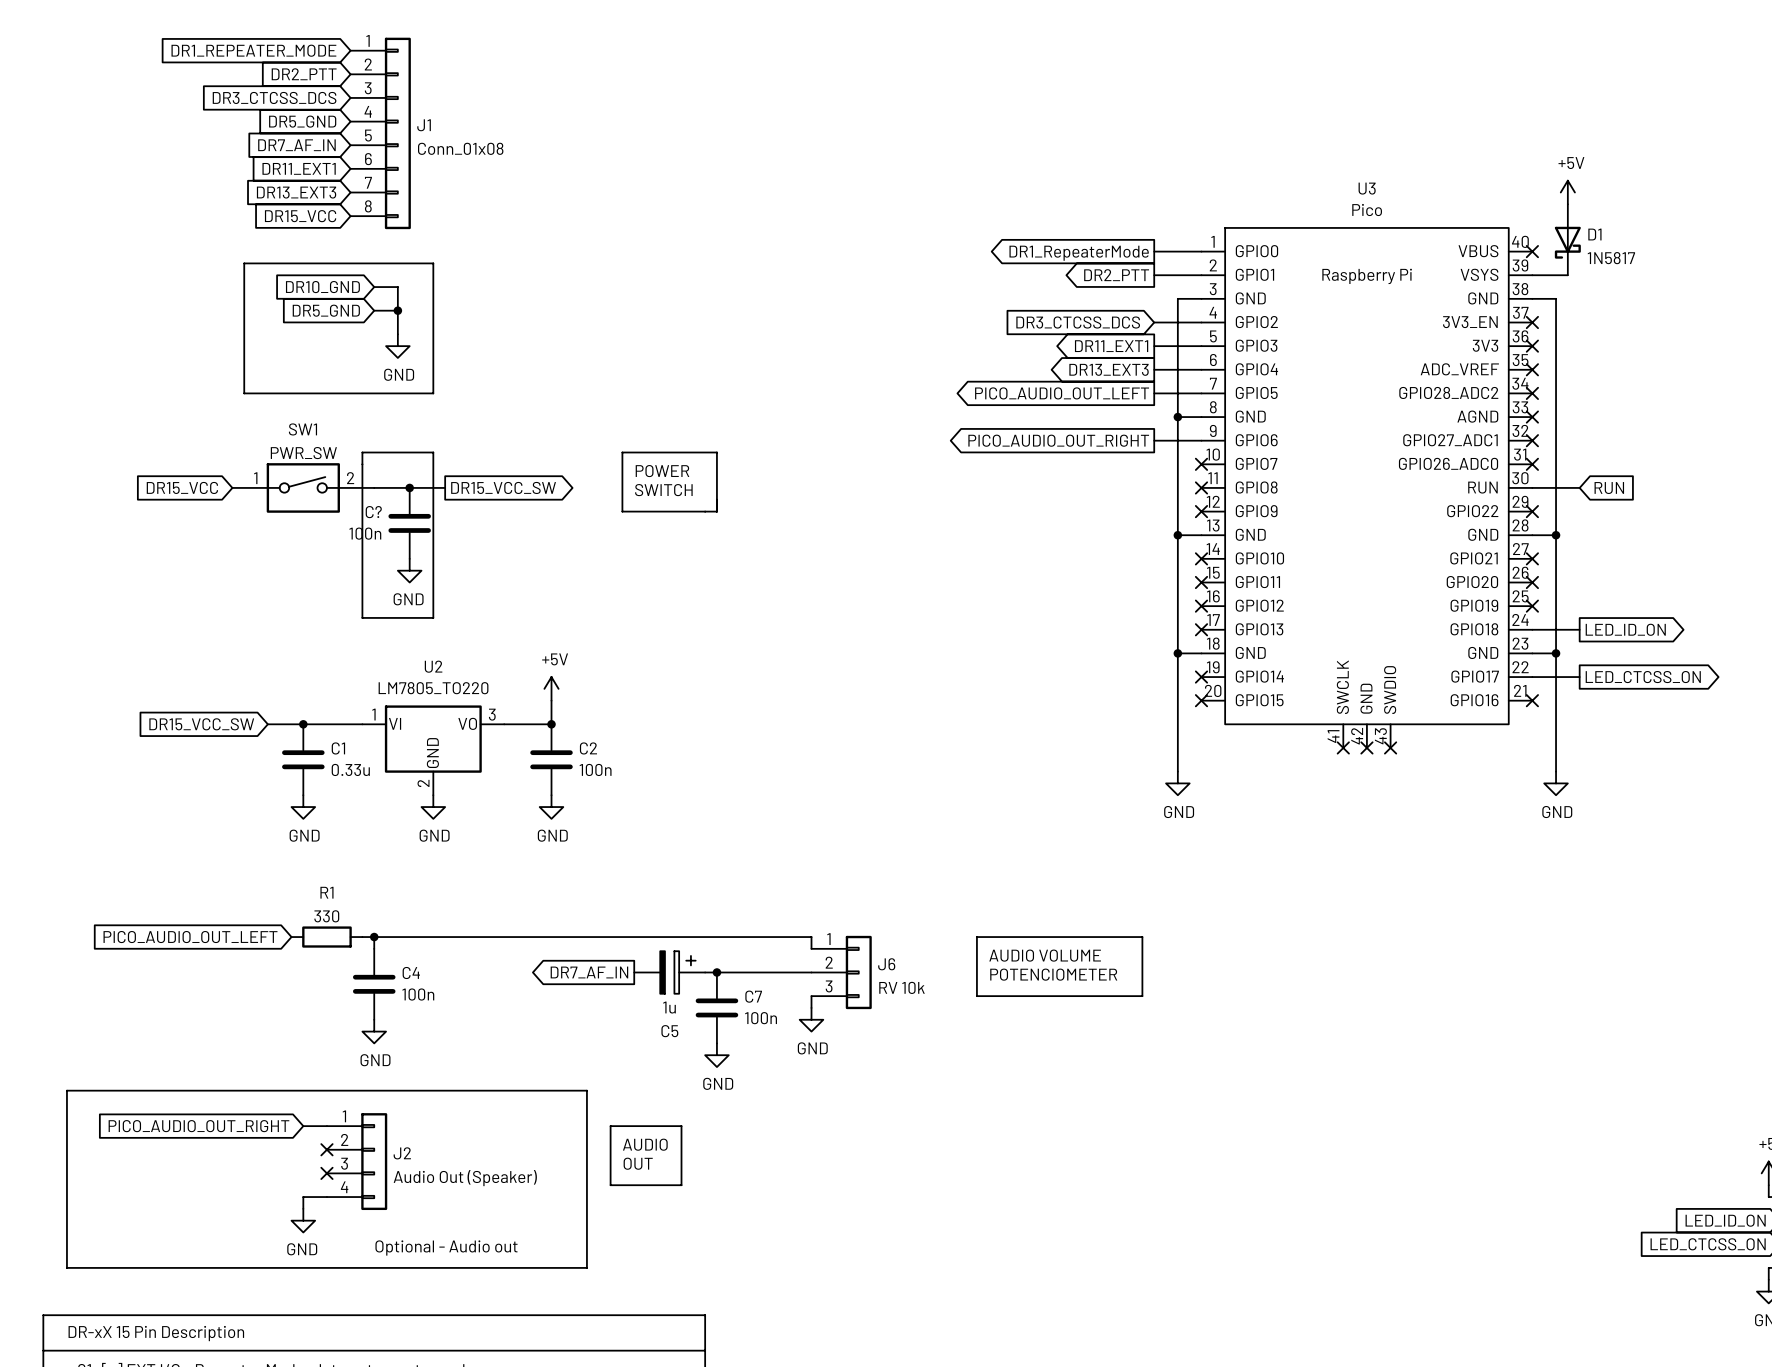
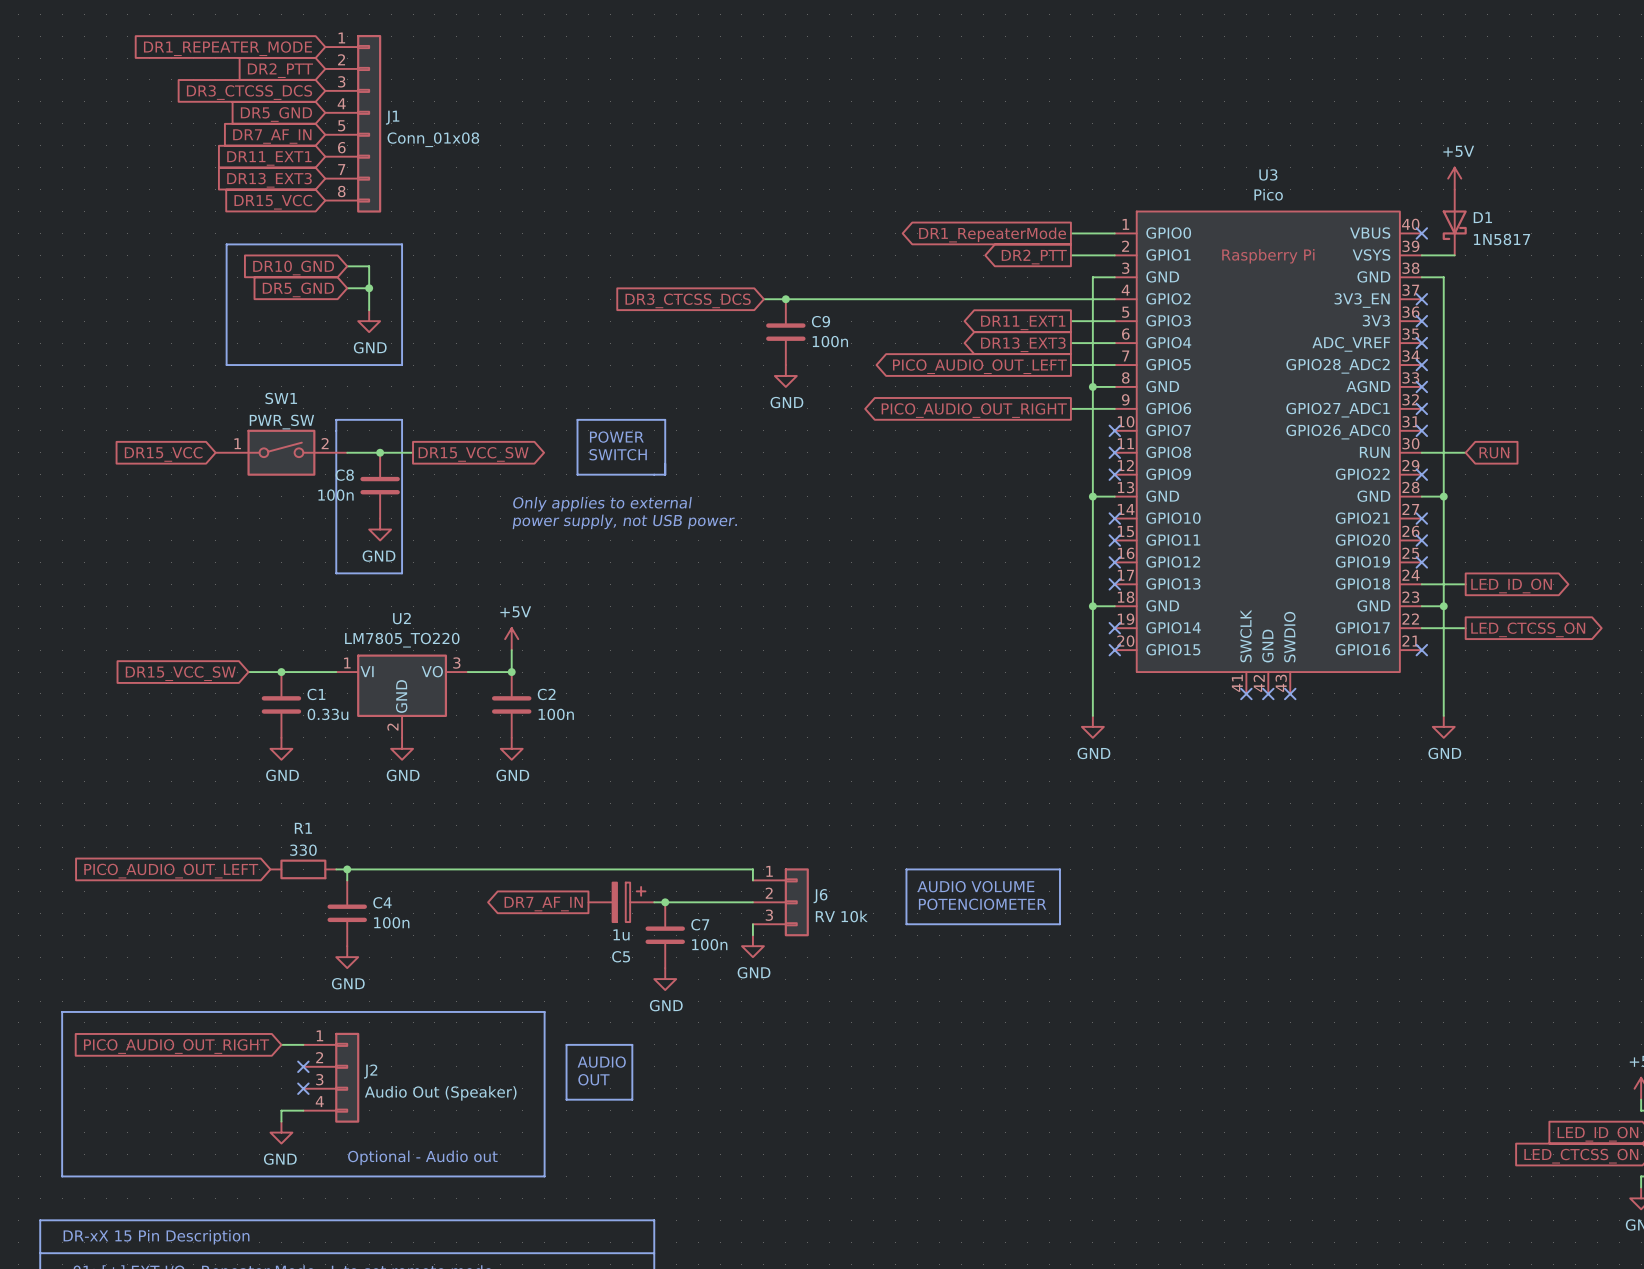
global label: none -> DR3_CTCSS_DCS (688, 300)
wire: none -> (763, 299) (1070, 299)
junction: none -> (785, 299)
global label: DR3_CTCSS_DCS (1078, 322) -> none
C9: none -> 100n (785, 332)
power symbol: none -> GND (785, 375)
C? name: C? (373, 512) -> C8 (344, 475)
text: none -> Only applies to external (602, 504)
text: none -> power supply, not USB power. (624, 521)

